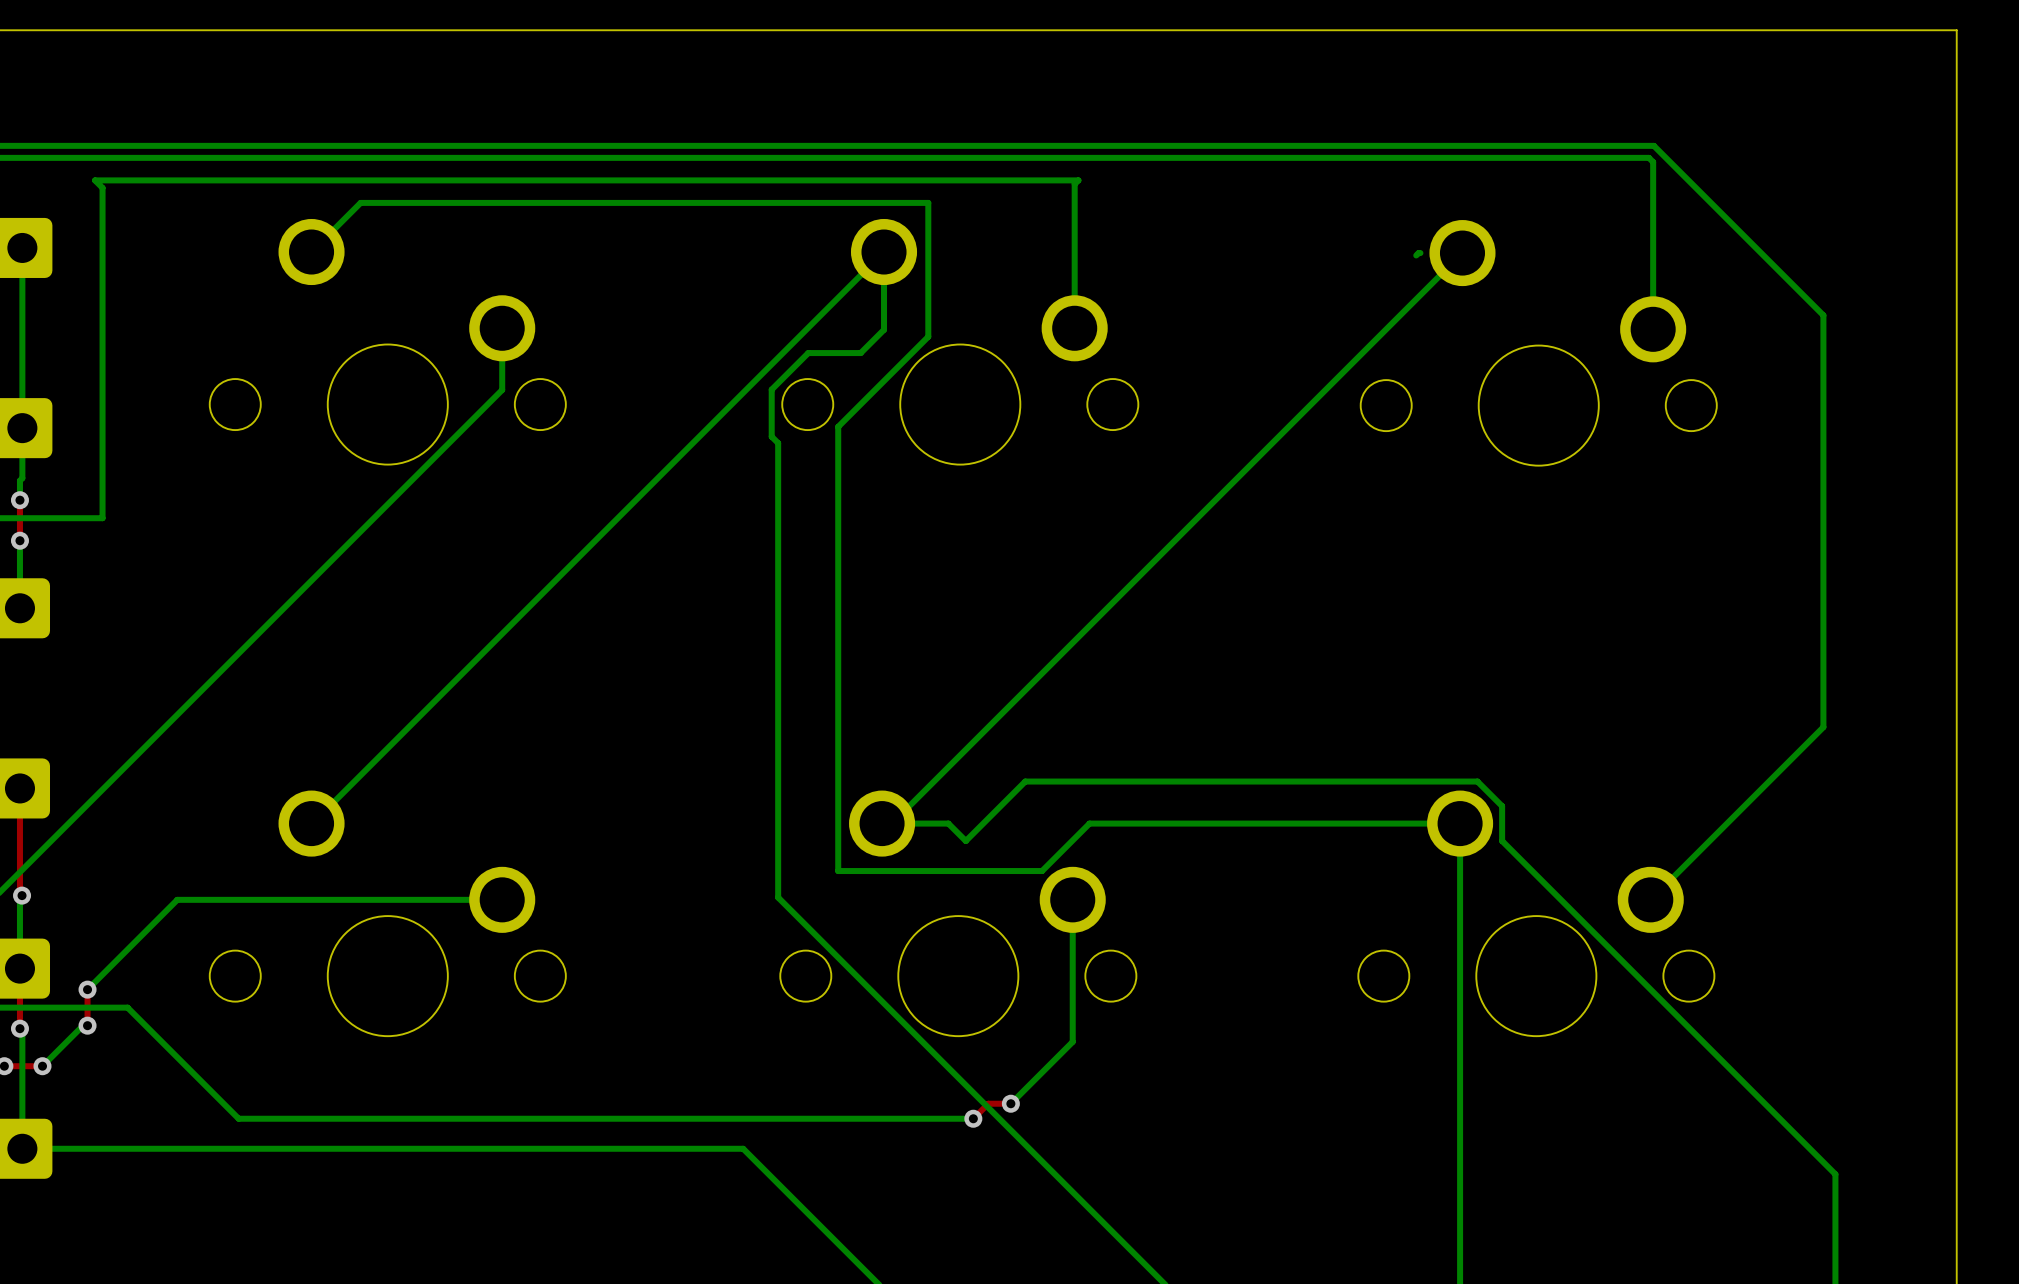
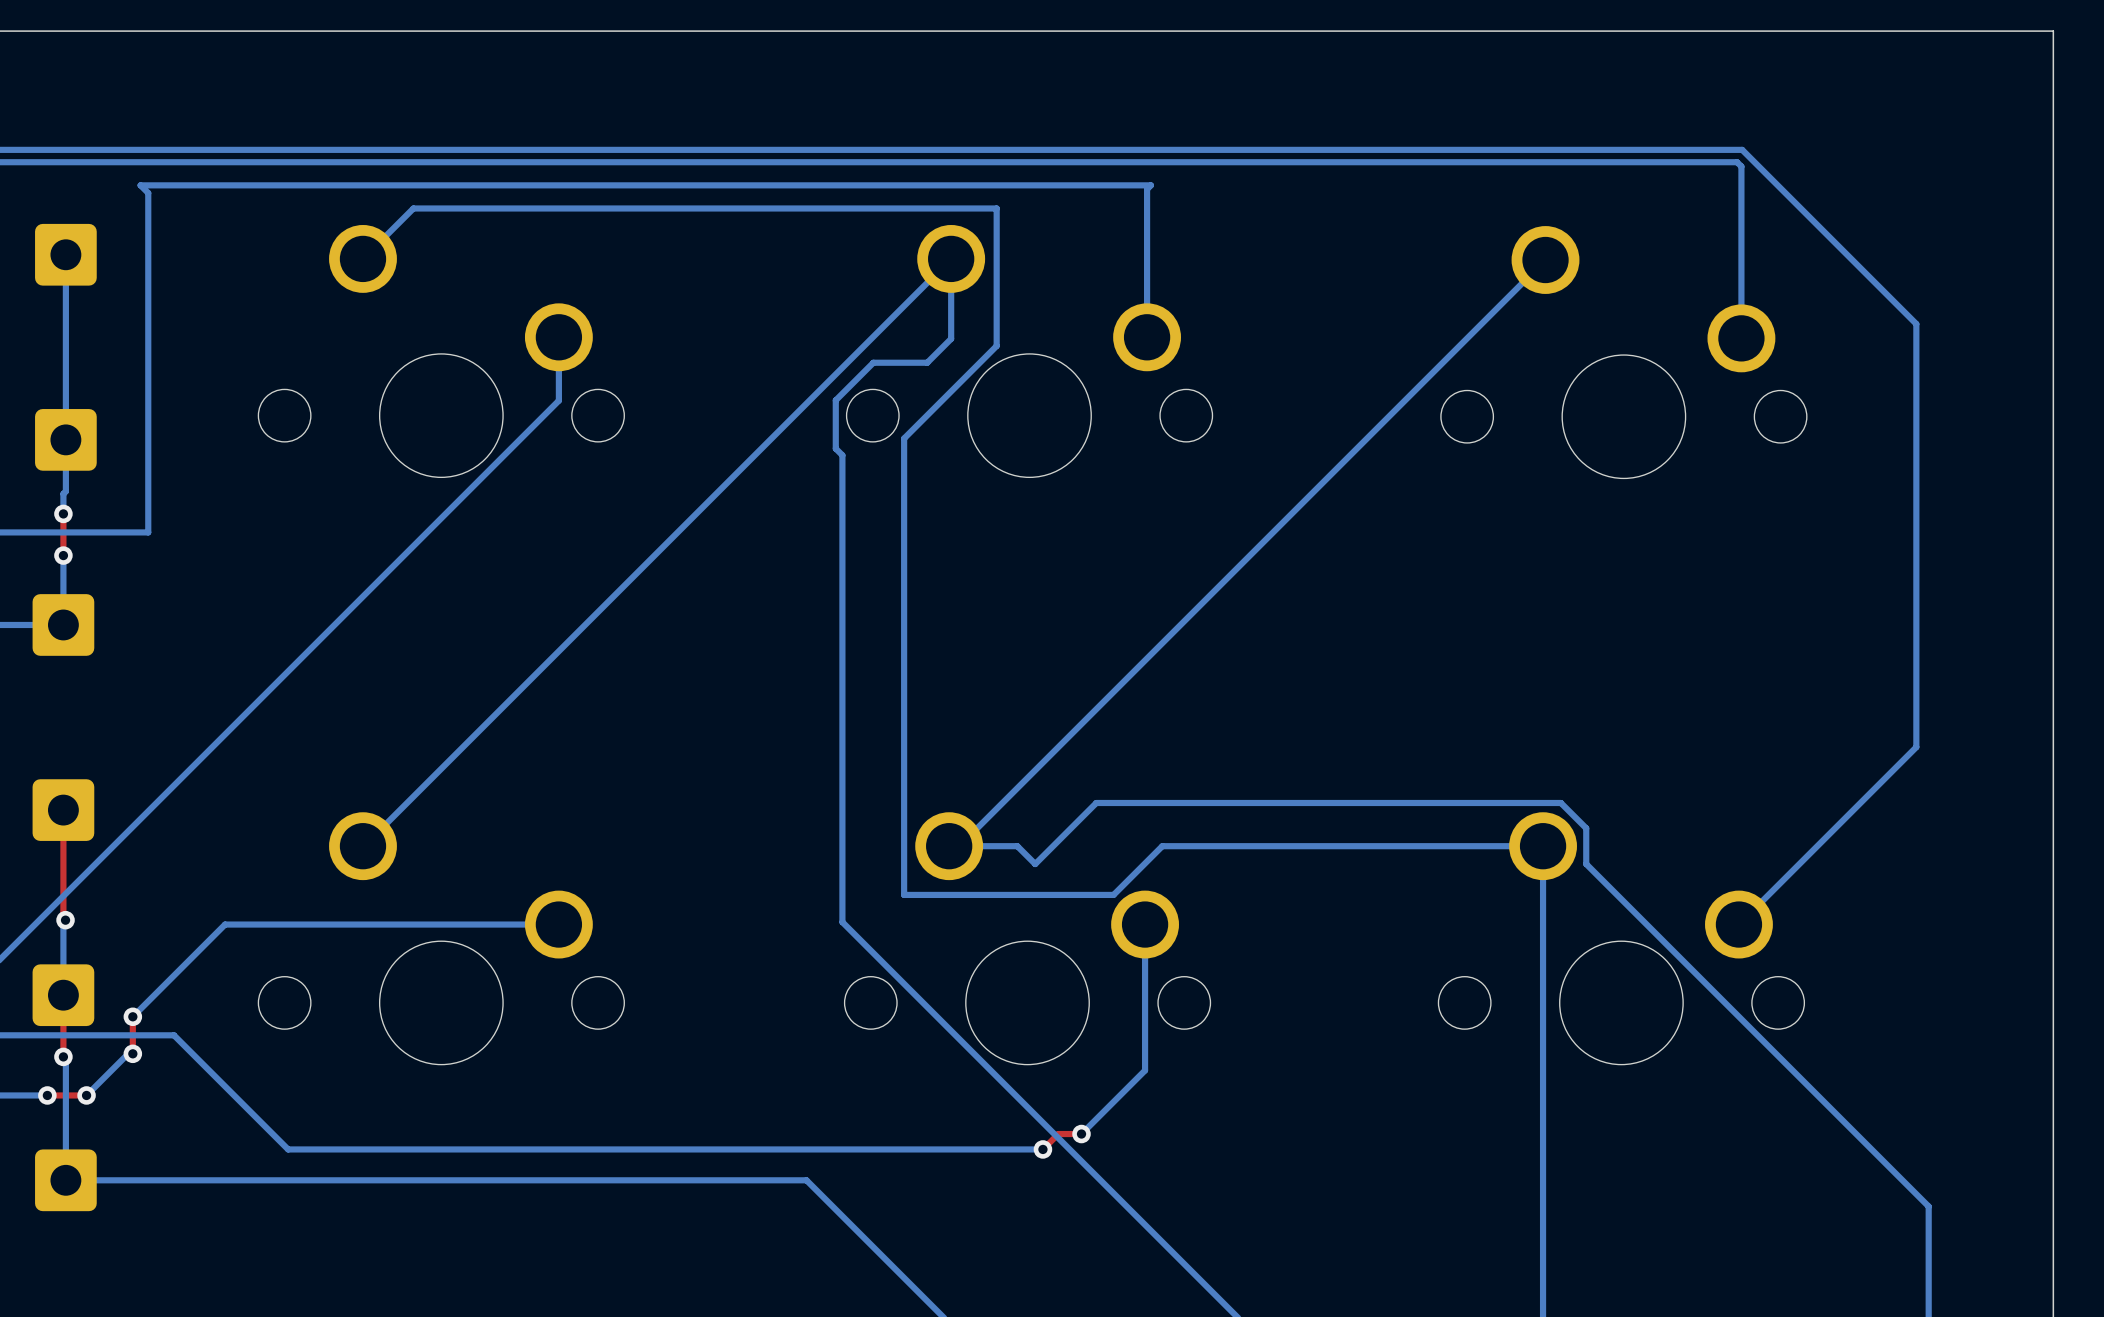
bottom track: (1420, 253) (1416, 255) -> none

